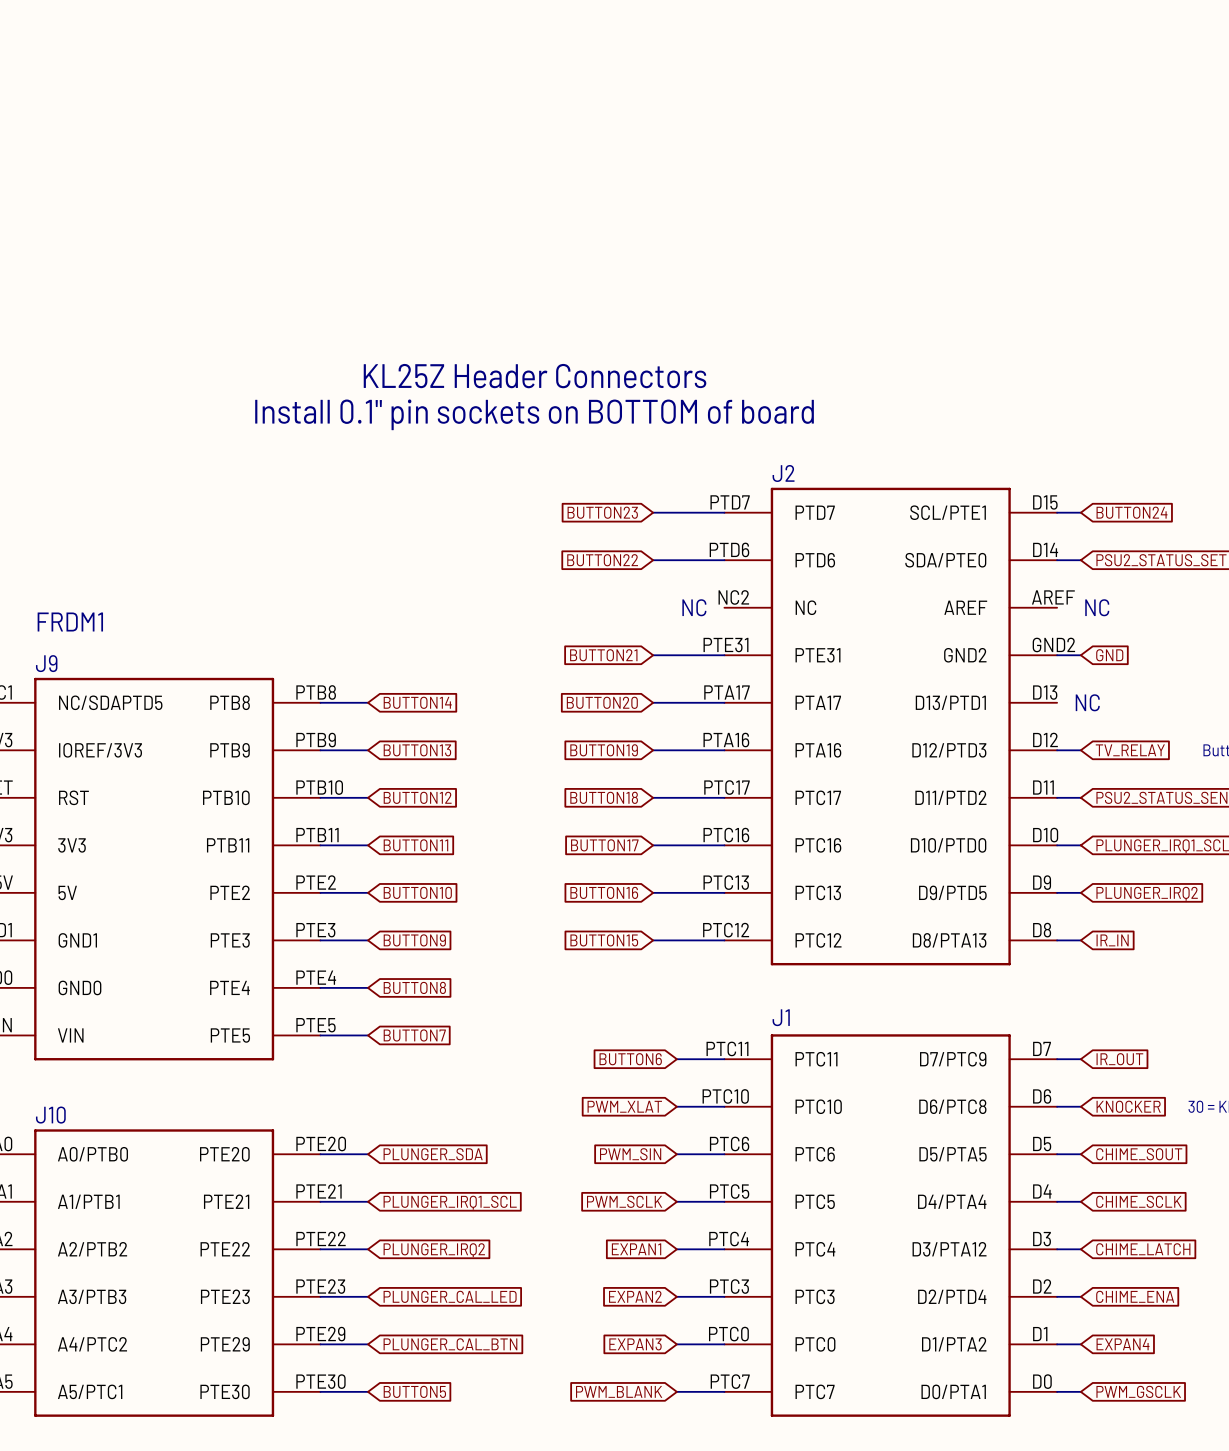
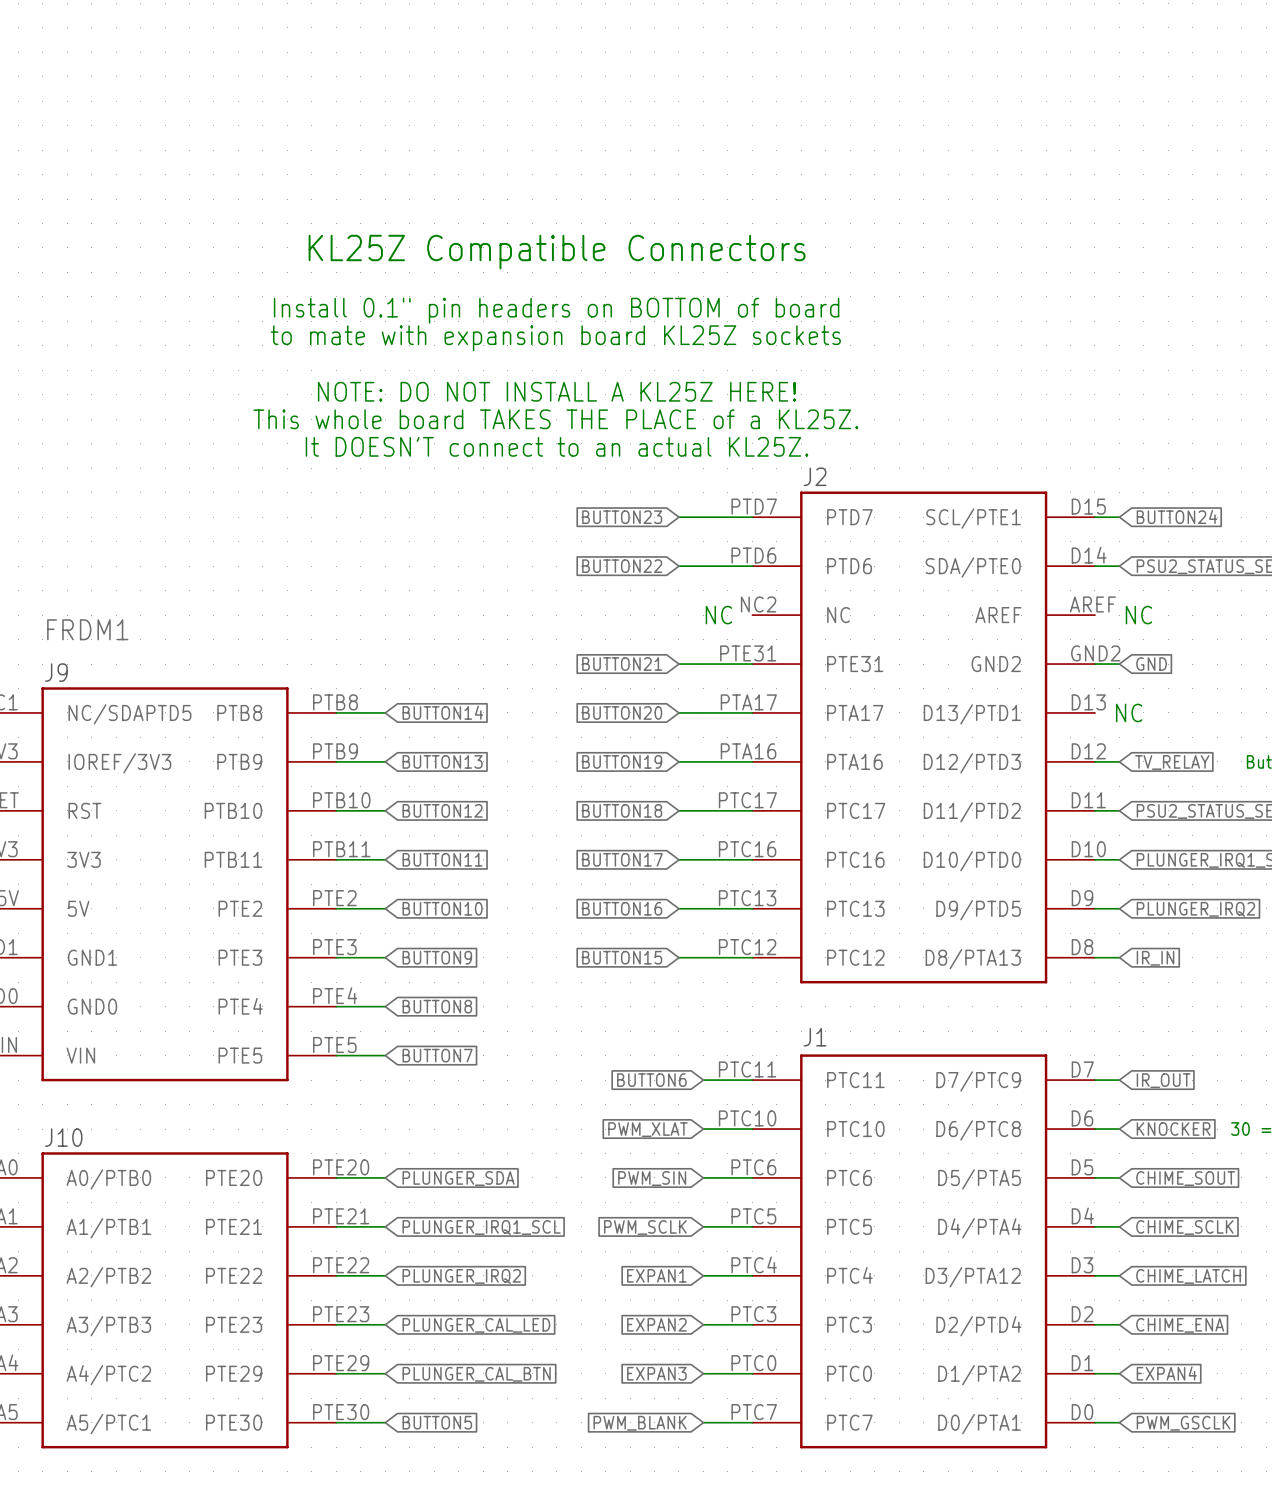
text: none -> KL25Z Compatible Connectors (557, 252)
text: none -> Install 0.1" pin headers on BOTTOM of board (556, 310)
text: none -> to mate with expansion board KL25Z sockets (555, 338)
text: KL25Z Header Connectors (535, 376) -> none
text: none -> NOTE: DO NOT INSTALL A KL25Z HERE! (556, 391)
text: Install 0.1" pin sockets on BOTTOM of board (534, 414) -> This whole board TAKES THE PLACE of a KL25Z. (555, 419)
text: none -> It DOESN'T connect to an actual KL25Z. (556, 446)

